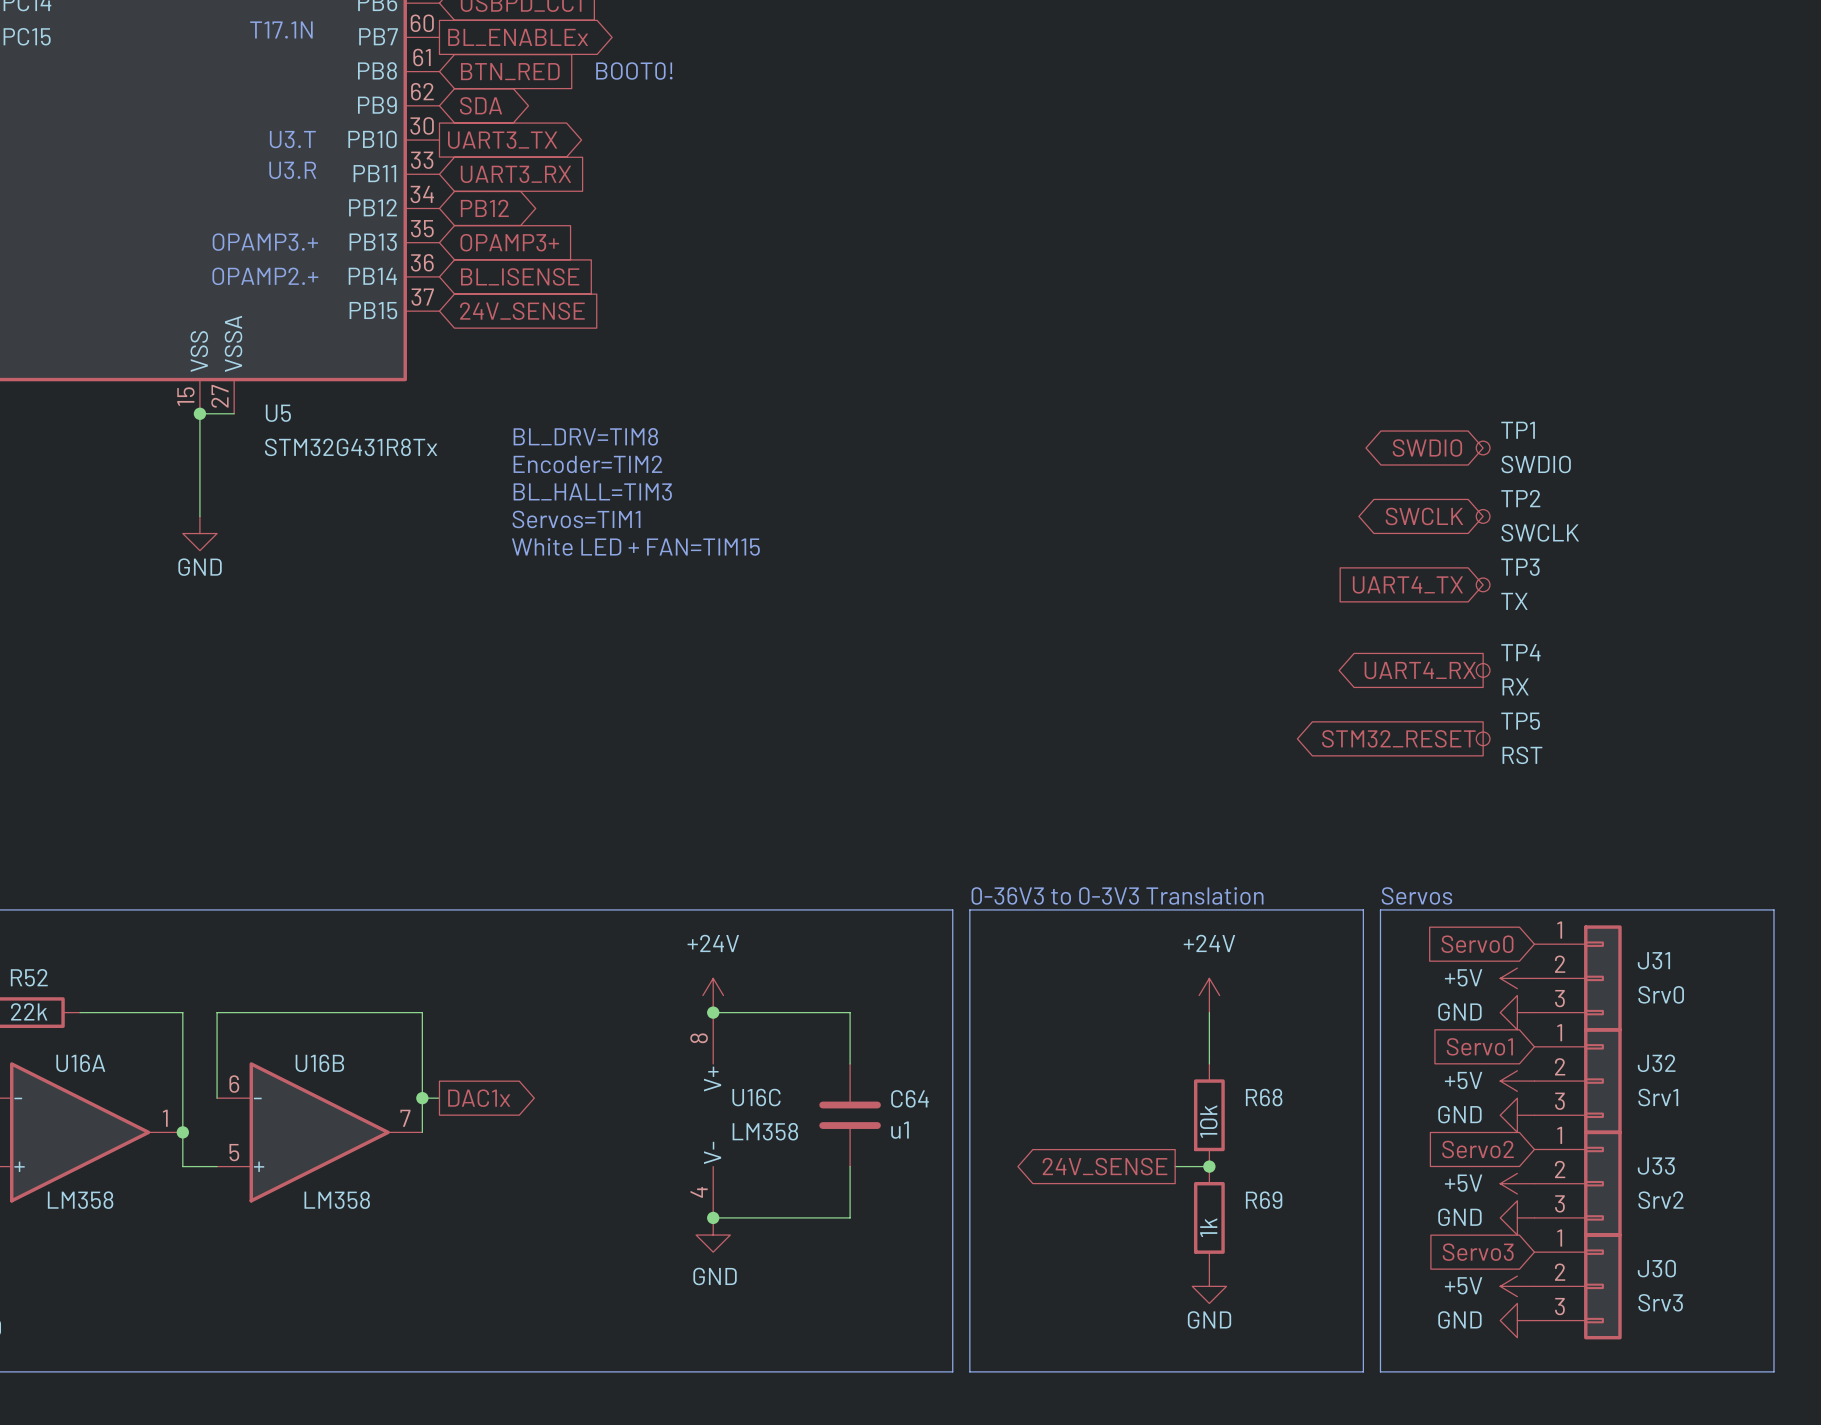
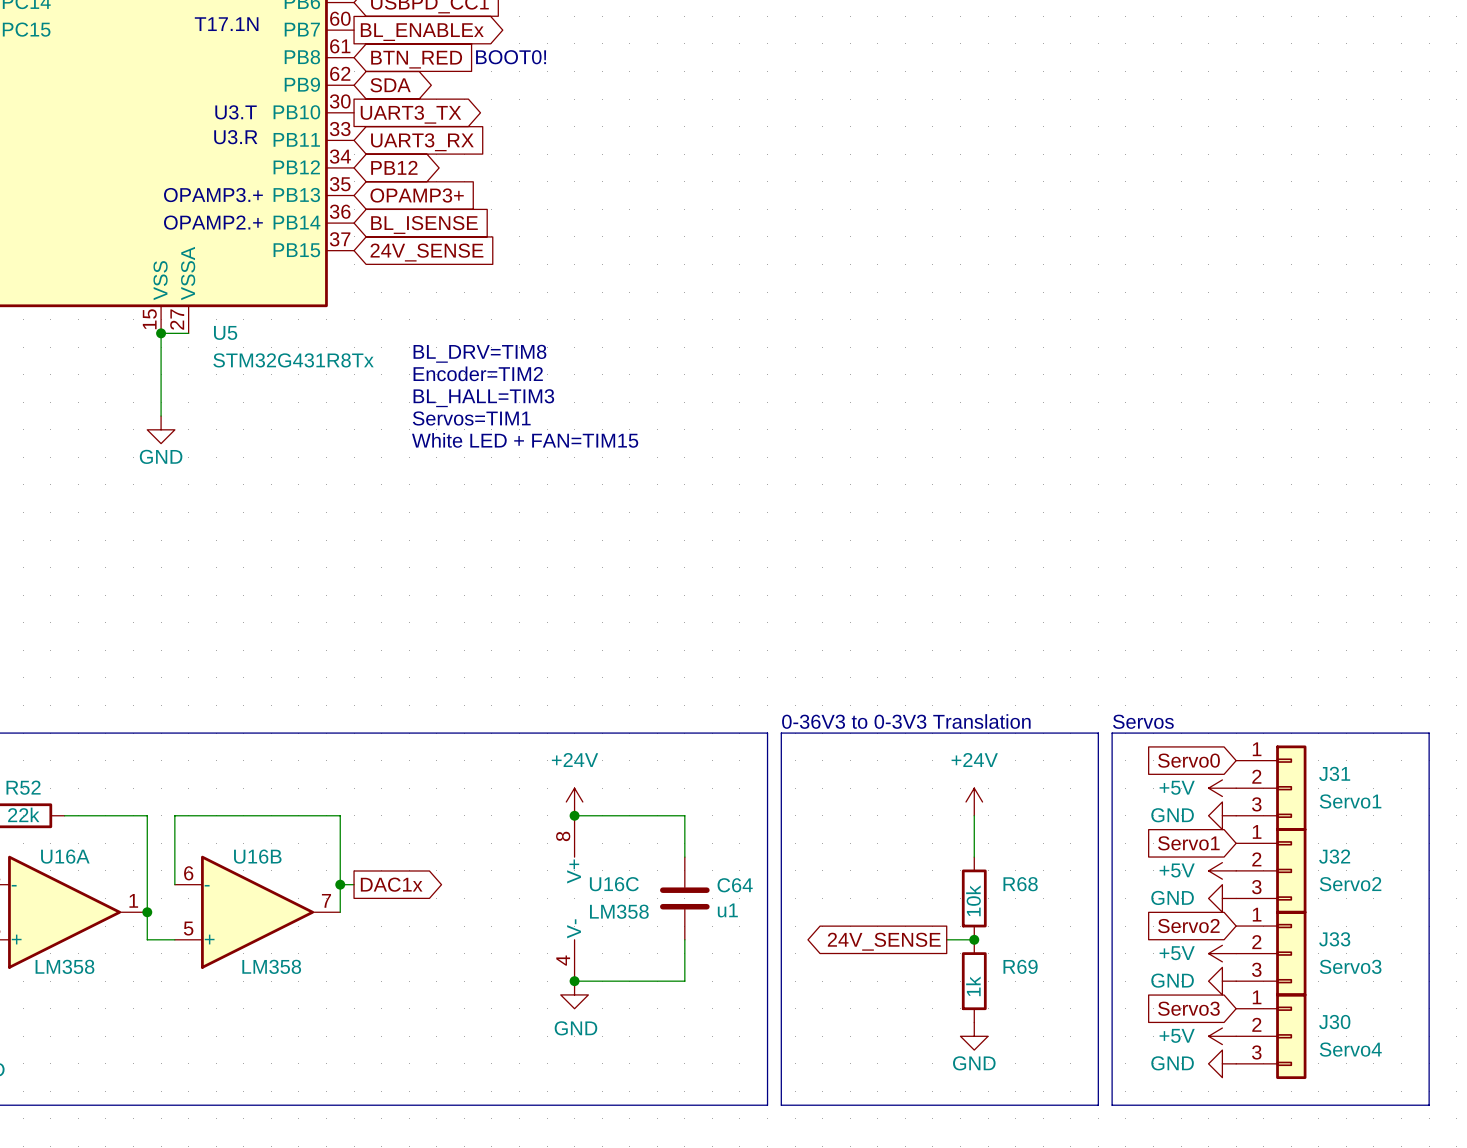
global label: SWDIO (1427, 448) -> none
TP1: SWDIO (1483, 448) -> none
global label: SWCLK (1424, 516) -> none
TP2: SWCLK (1483, 516) -> none
global label: UART4_TX (1407, 584) -> none
TP3: TX (1483, 584) -> none
global label: UART4_RX (1420, 670) -> none
TP4: RX (1483, 670) -> none
global label: STM32_RESET (1398, 738) -> none
TP5: RST (1483, 738) -> none
J31 value: Srv0 (1661, 994) -> Servo1 (1350, 801)
J32 value: Srv1 (1658, 1097) -> Servo2 (1350, 884)
J33 value: Srv2 (1660, 1200) -> Servo3 (1350, 966)
J30 value: Srv3 (1660, 1302) -> Servo4 (1350, 1049)

